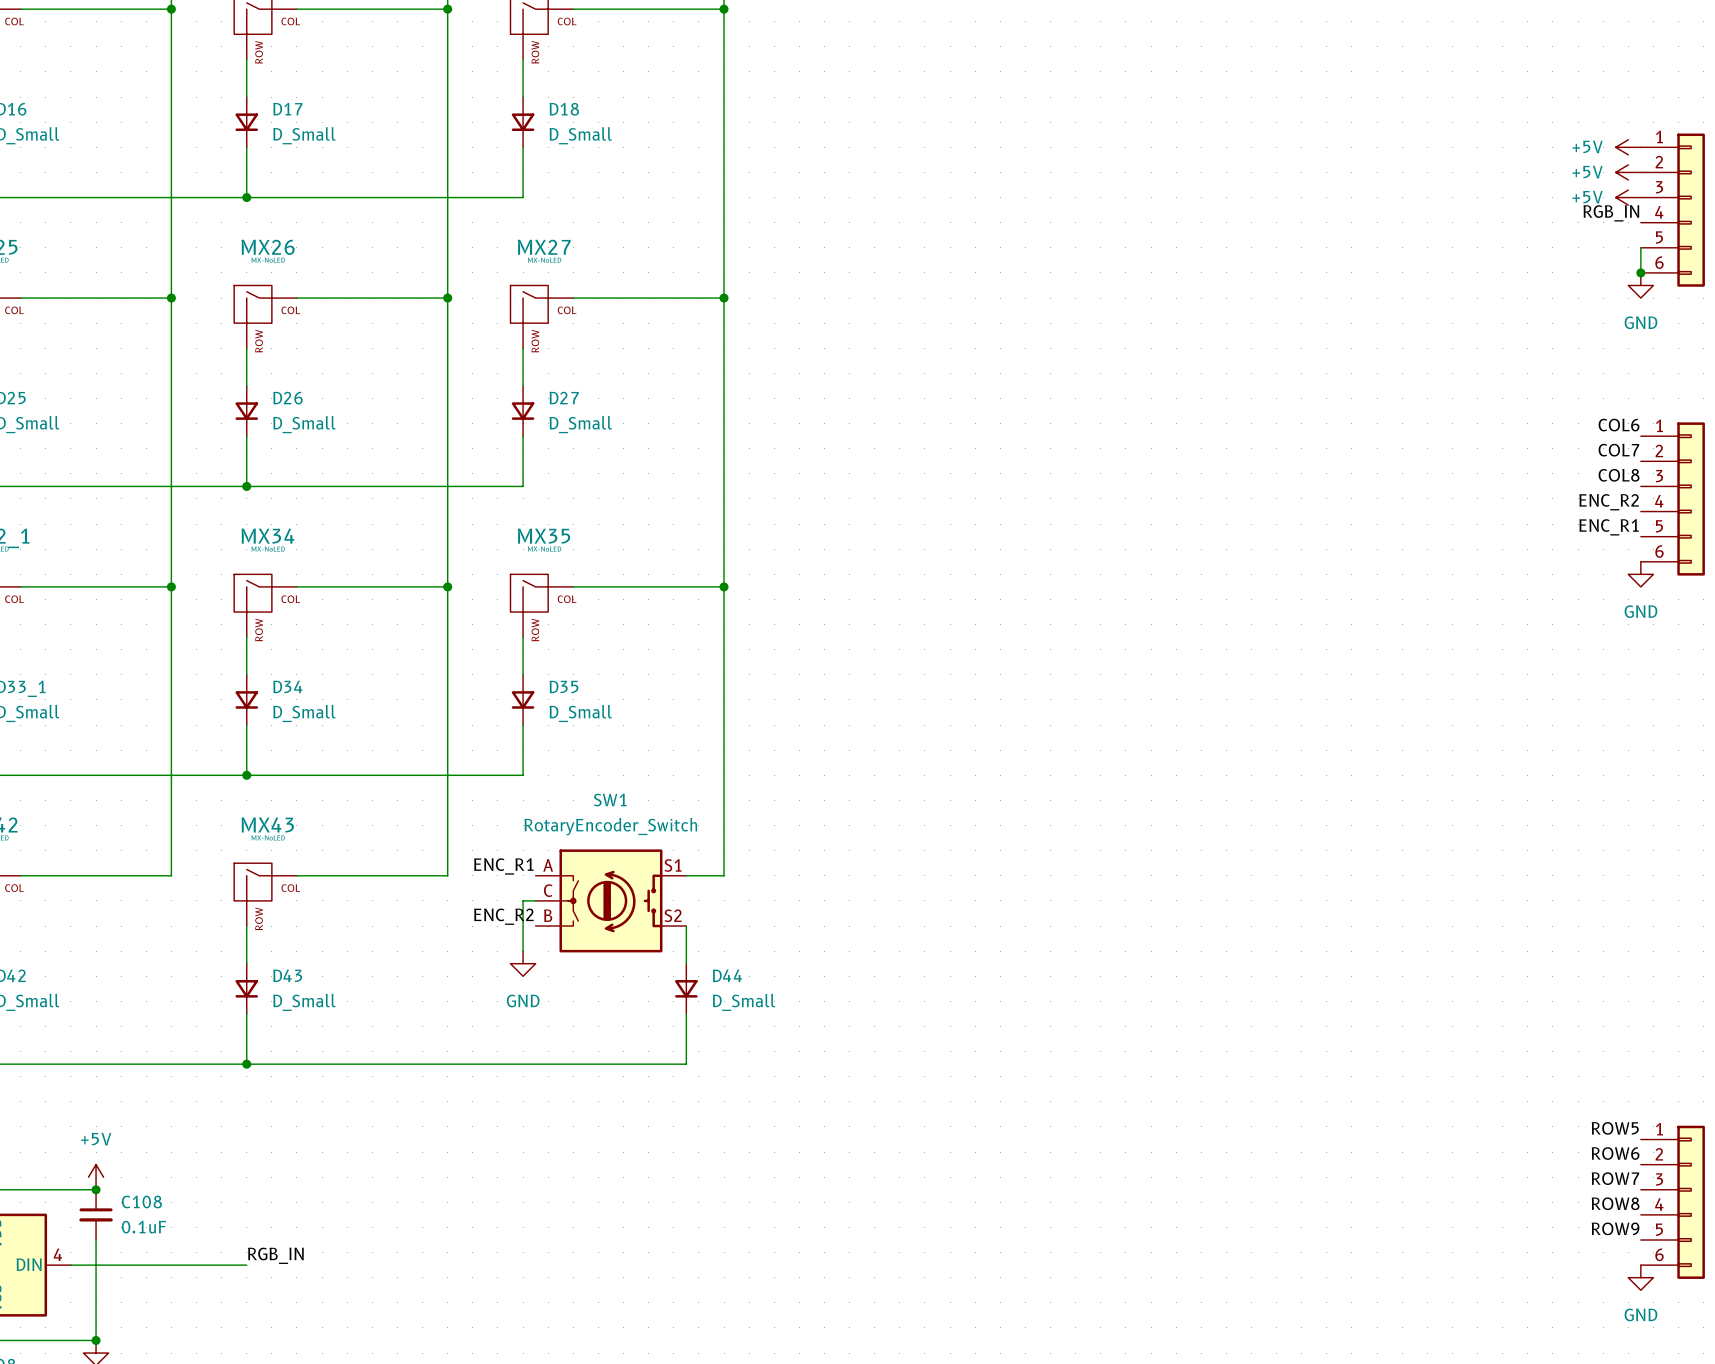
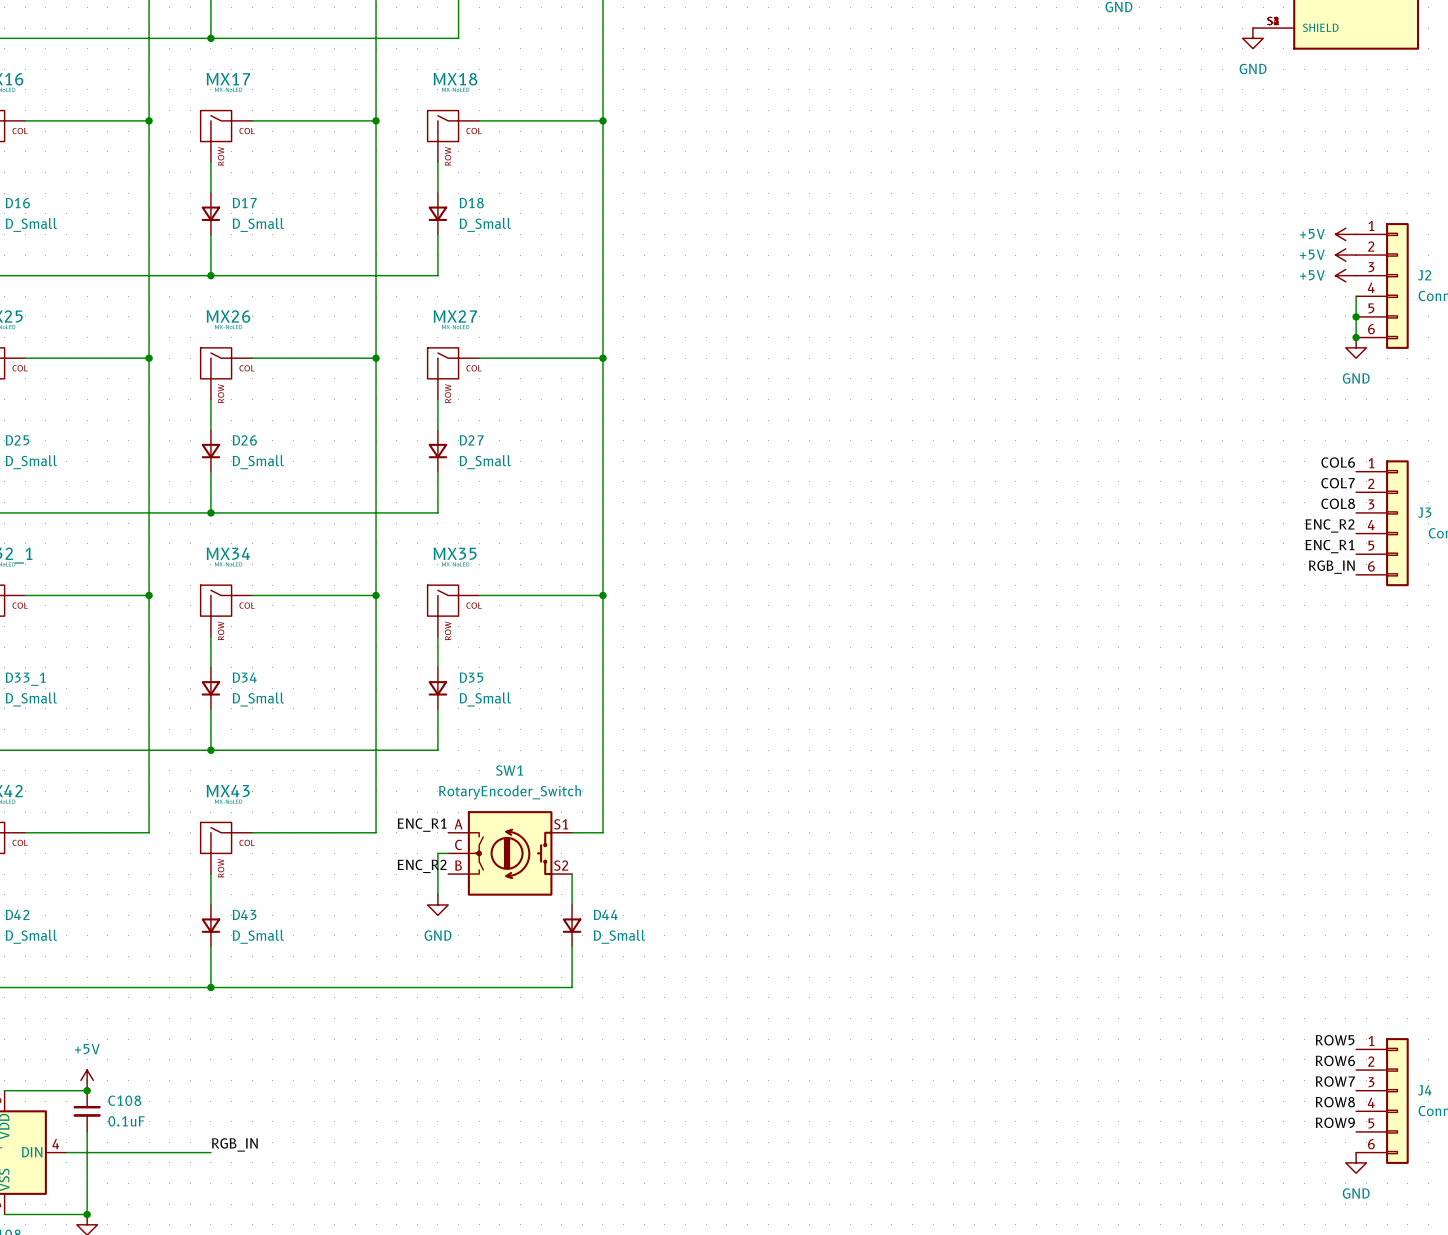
label: RGB_IN (1611, 213) -> none
wire: none -> (1356, 296) (1356, 316)
junction: none -> (1356, 316)
label: none -> RGB_IN (1331, 567)
power symbol: GND (1640, 574) -> none

